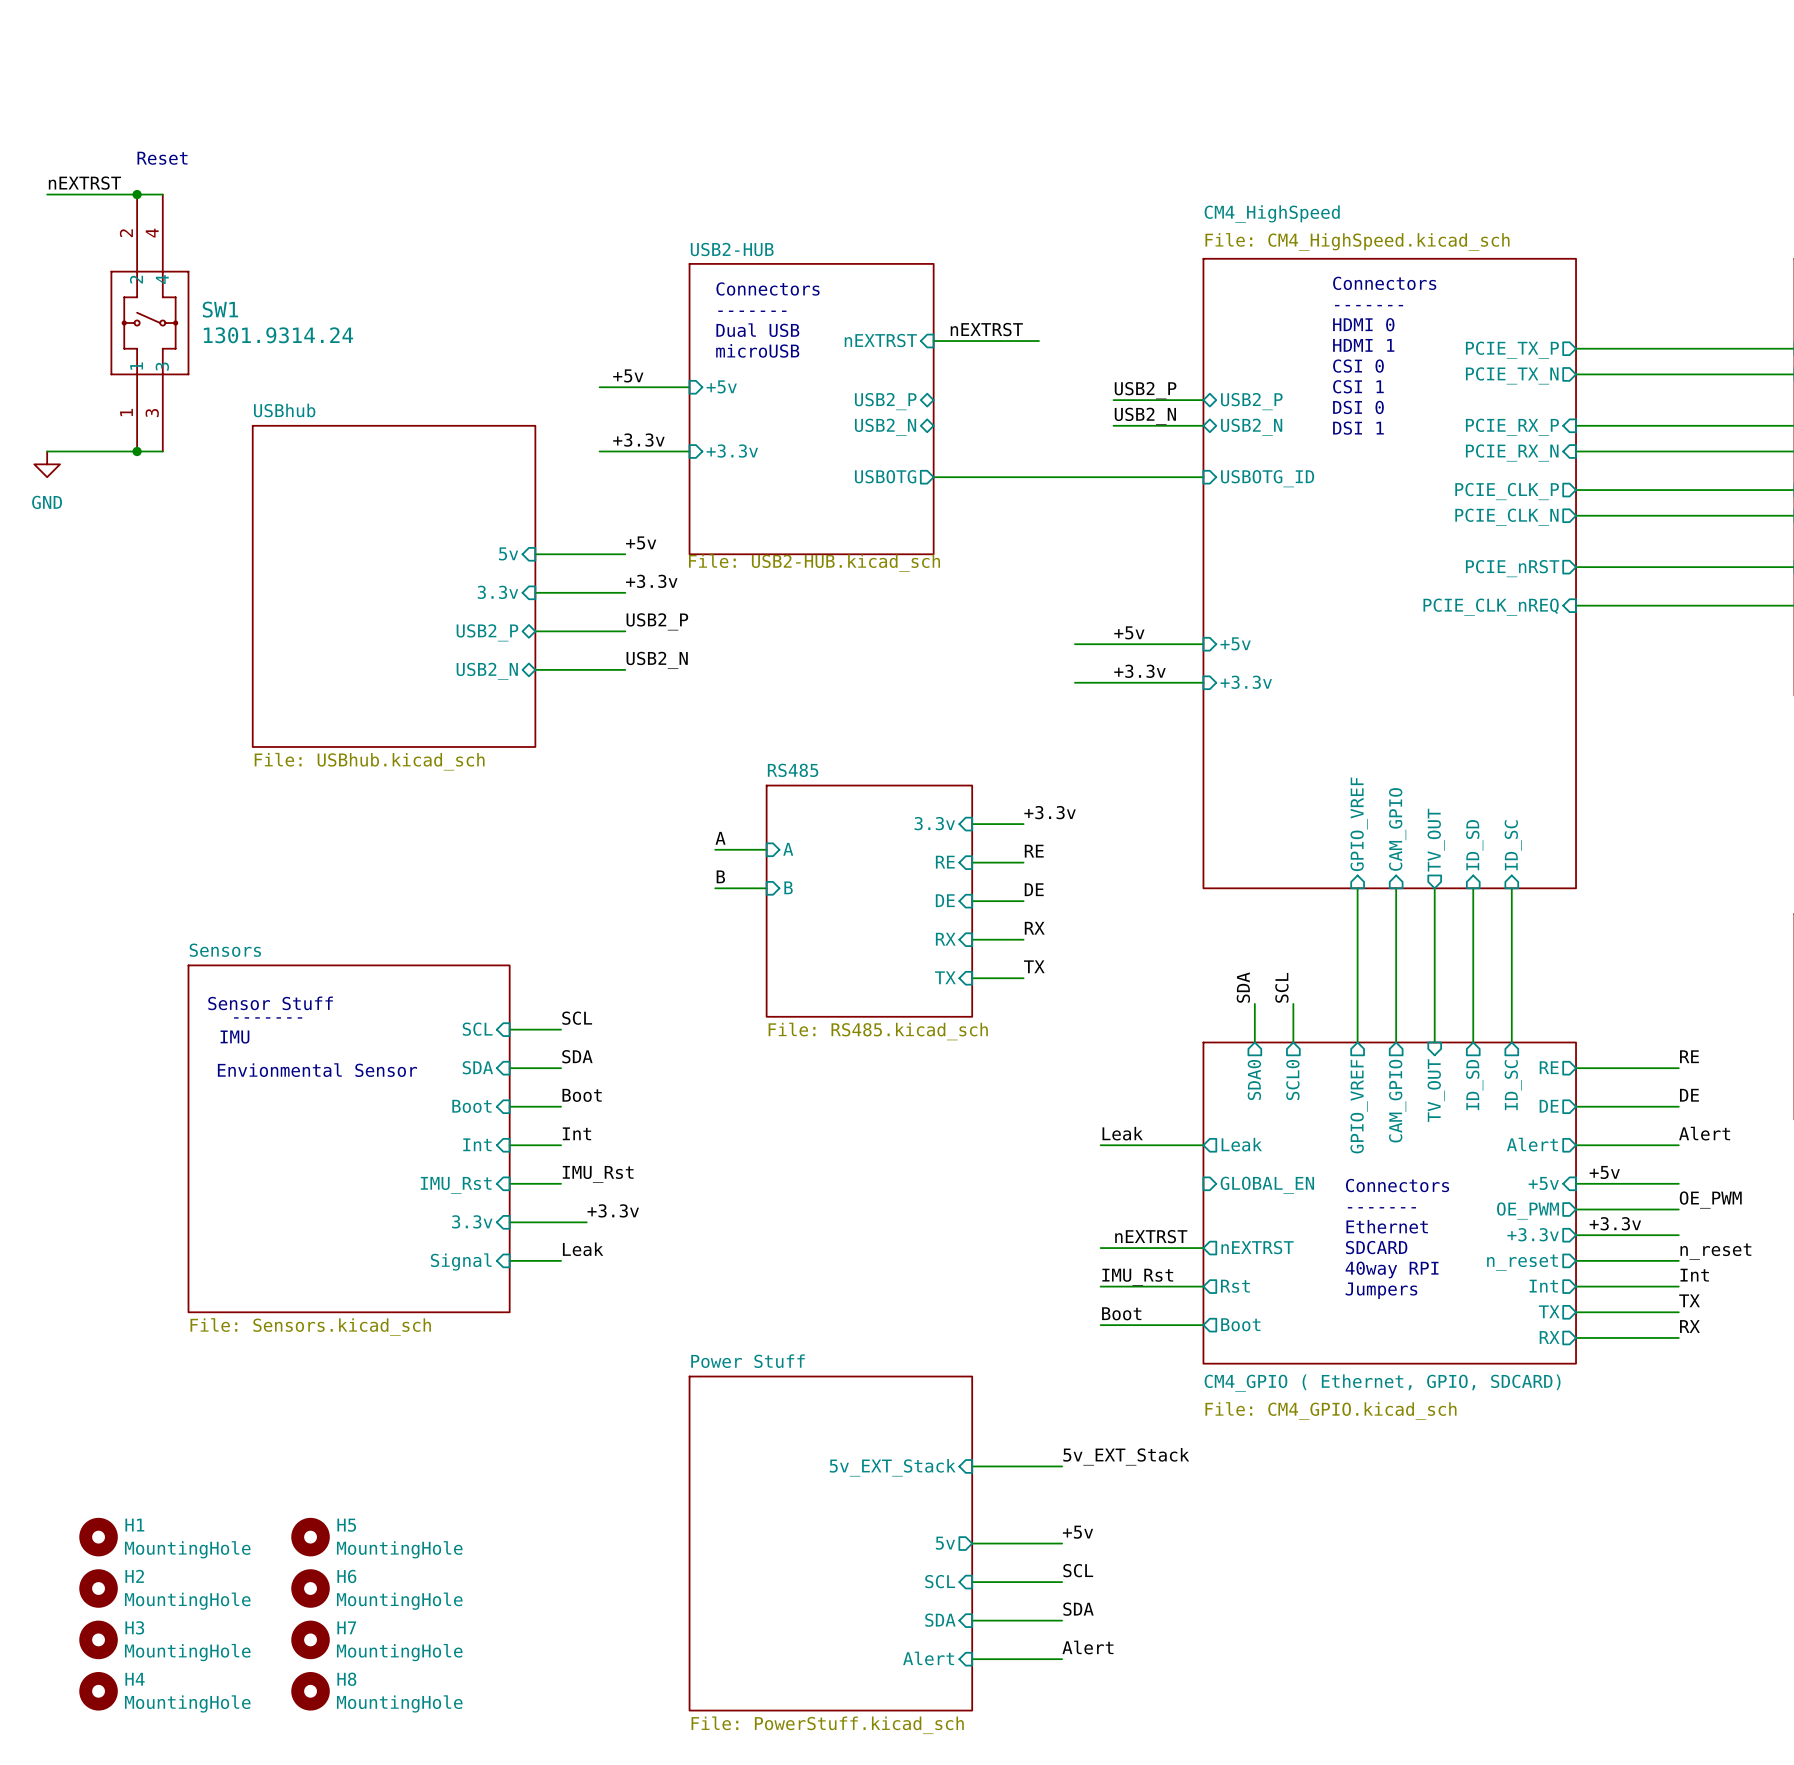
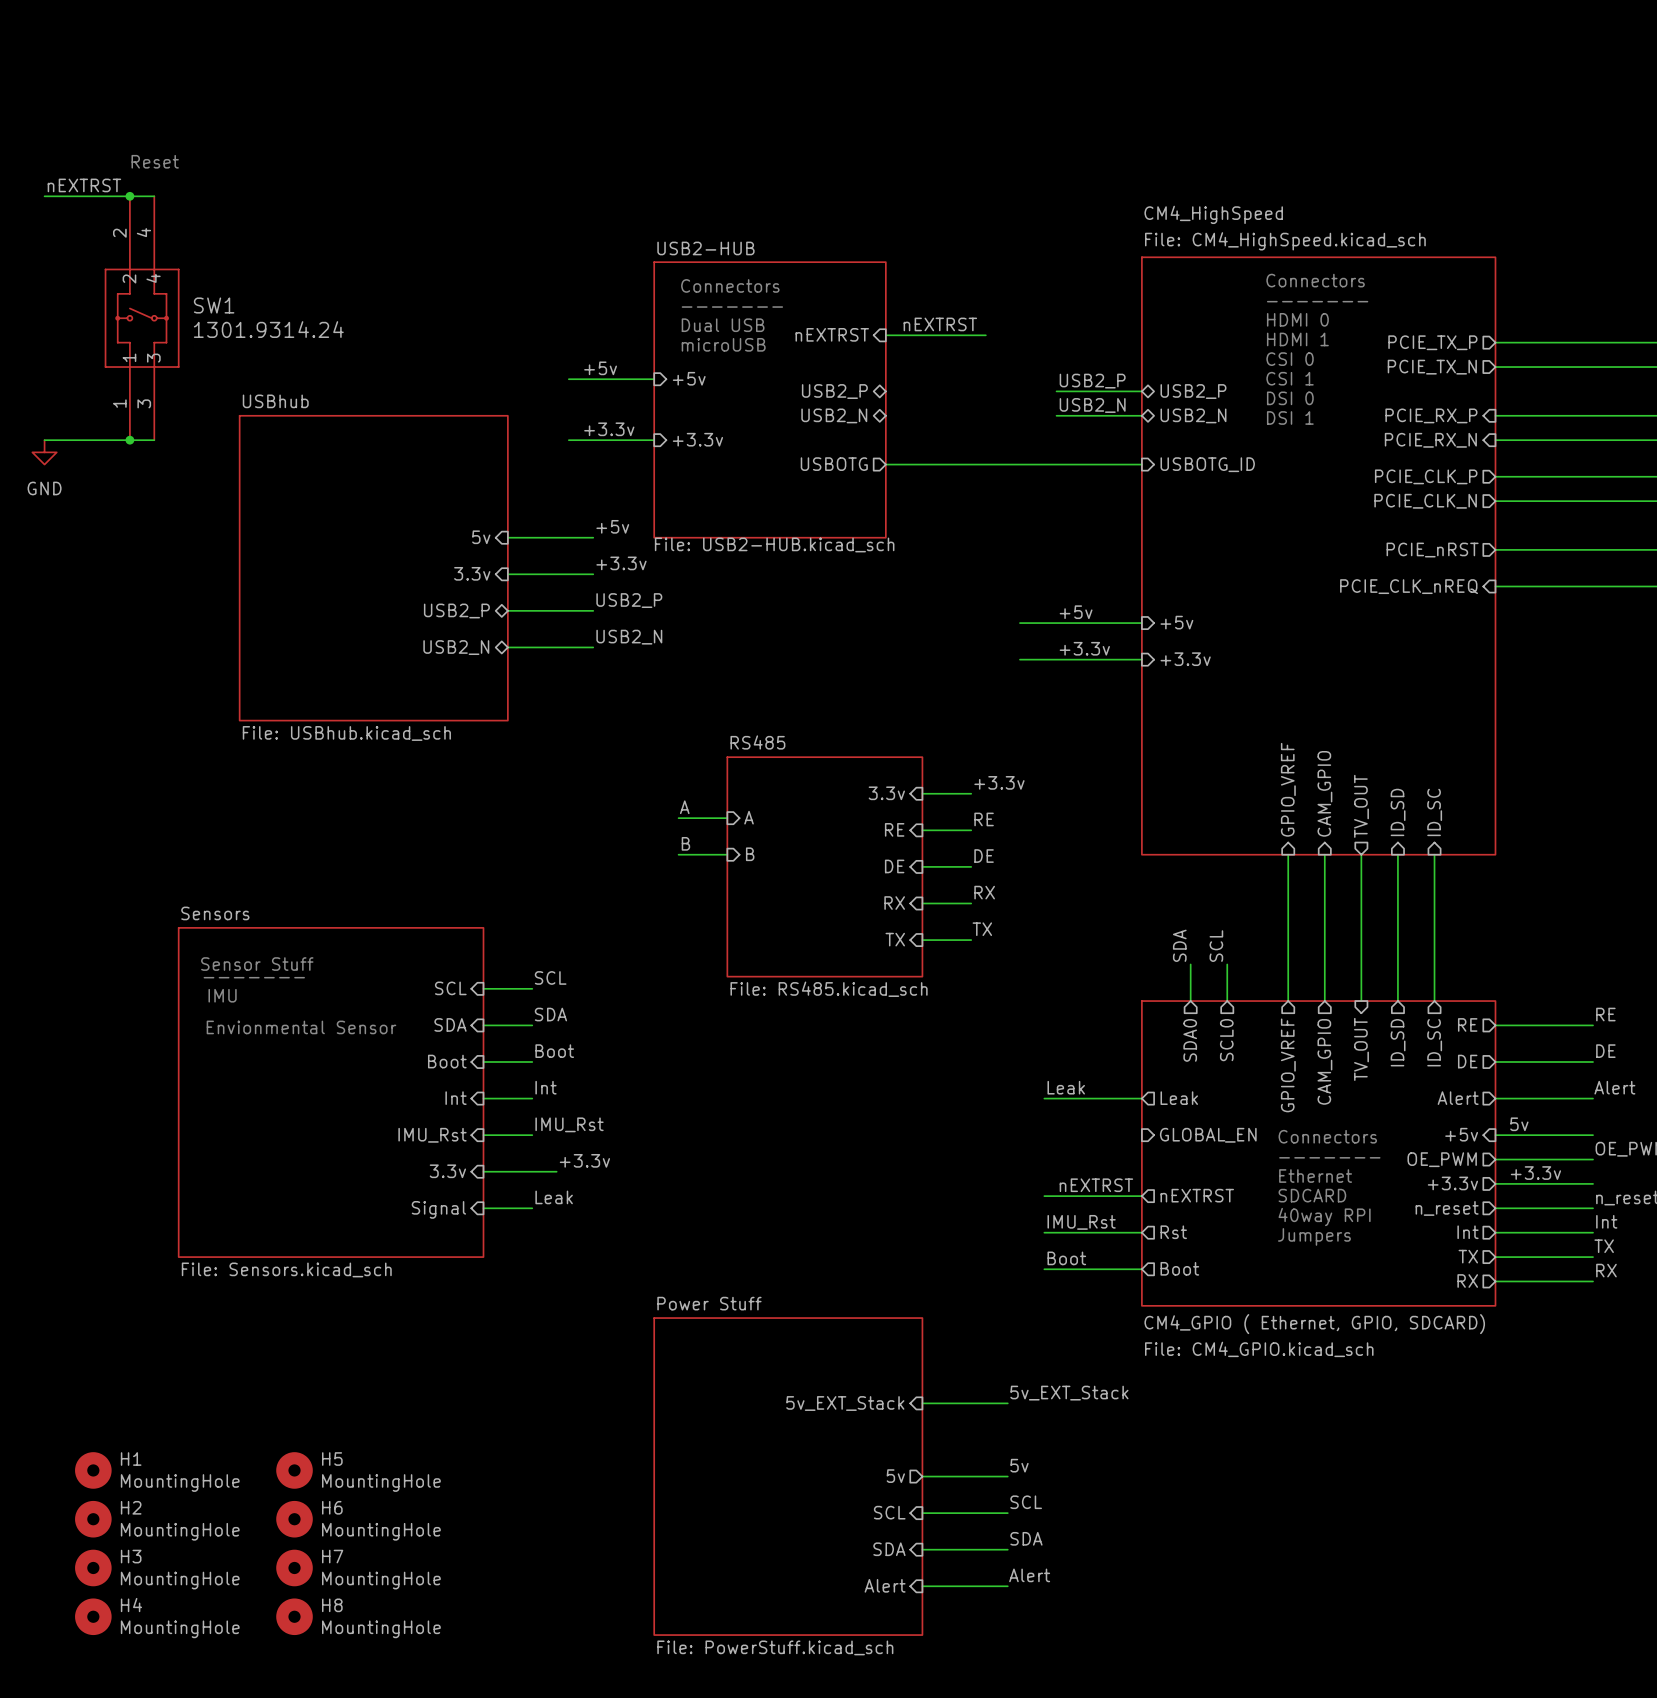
label: +5v (1604, 1172) -> 5v (1519, 1124)
label: +5v (1077, 1532) -> 5v (1019, 1465)

